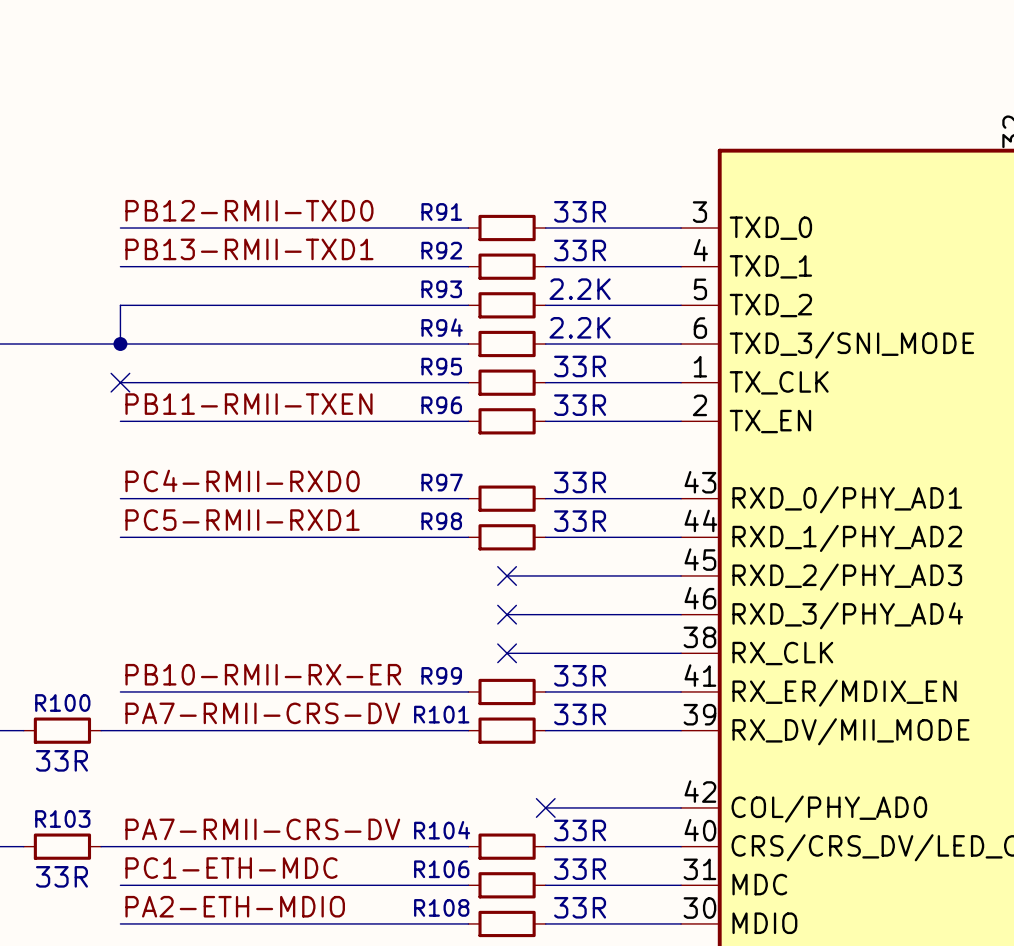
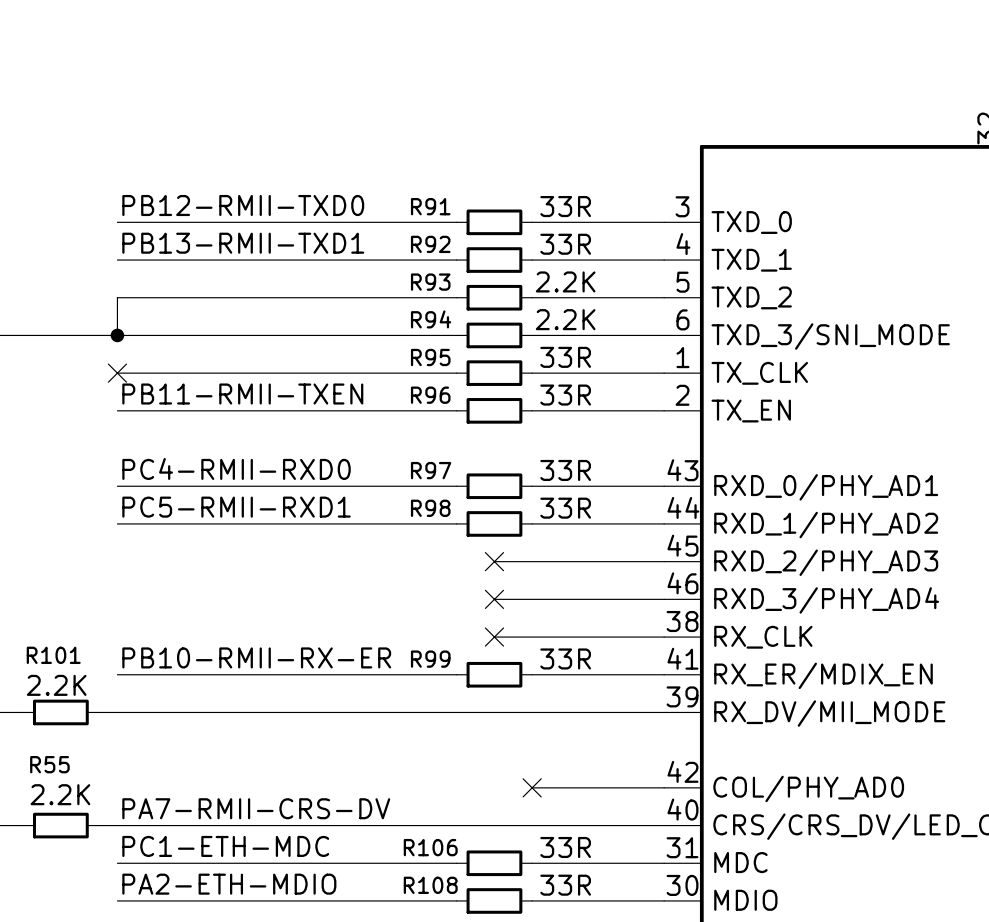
R100 name: R100 (62, 703) -> R101 (53, 655)
label: PA7-RMII-CRS-DV (262, 713) -> none
wire: none -> (456, 712) (532, 712)
R101: 33R (507, 730) -> none
R100 value: 33R (61, 760) -> 2.2K (56, 685)
R103 name: R103 (62, 818) -> R55 (49, 764)
wire: none -> (456, 825) (532, 825)
R104: 33R (507, 846) -> none
R103 value: 33R (61, 876) -> 2.2K (60, 794)

